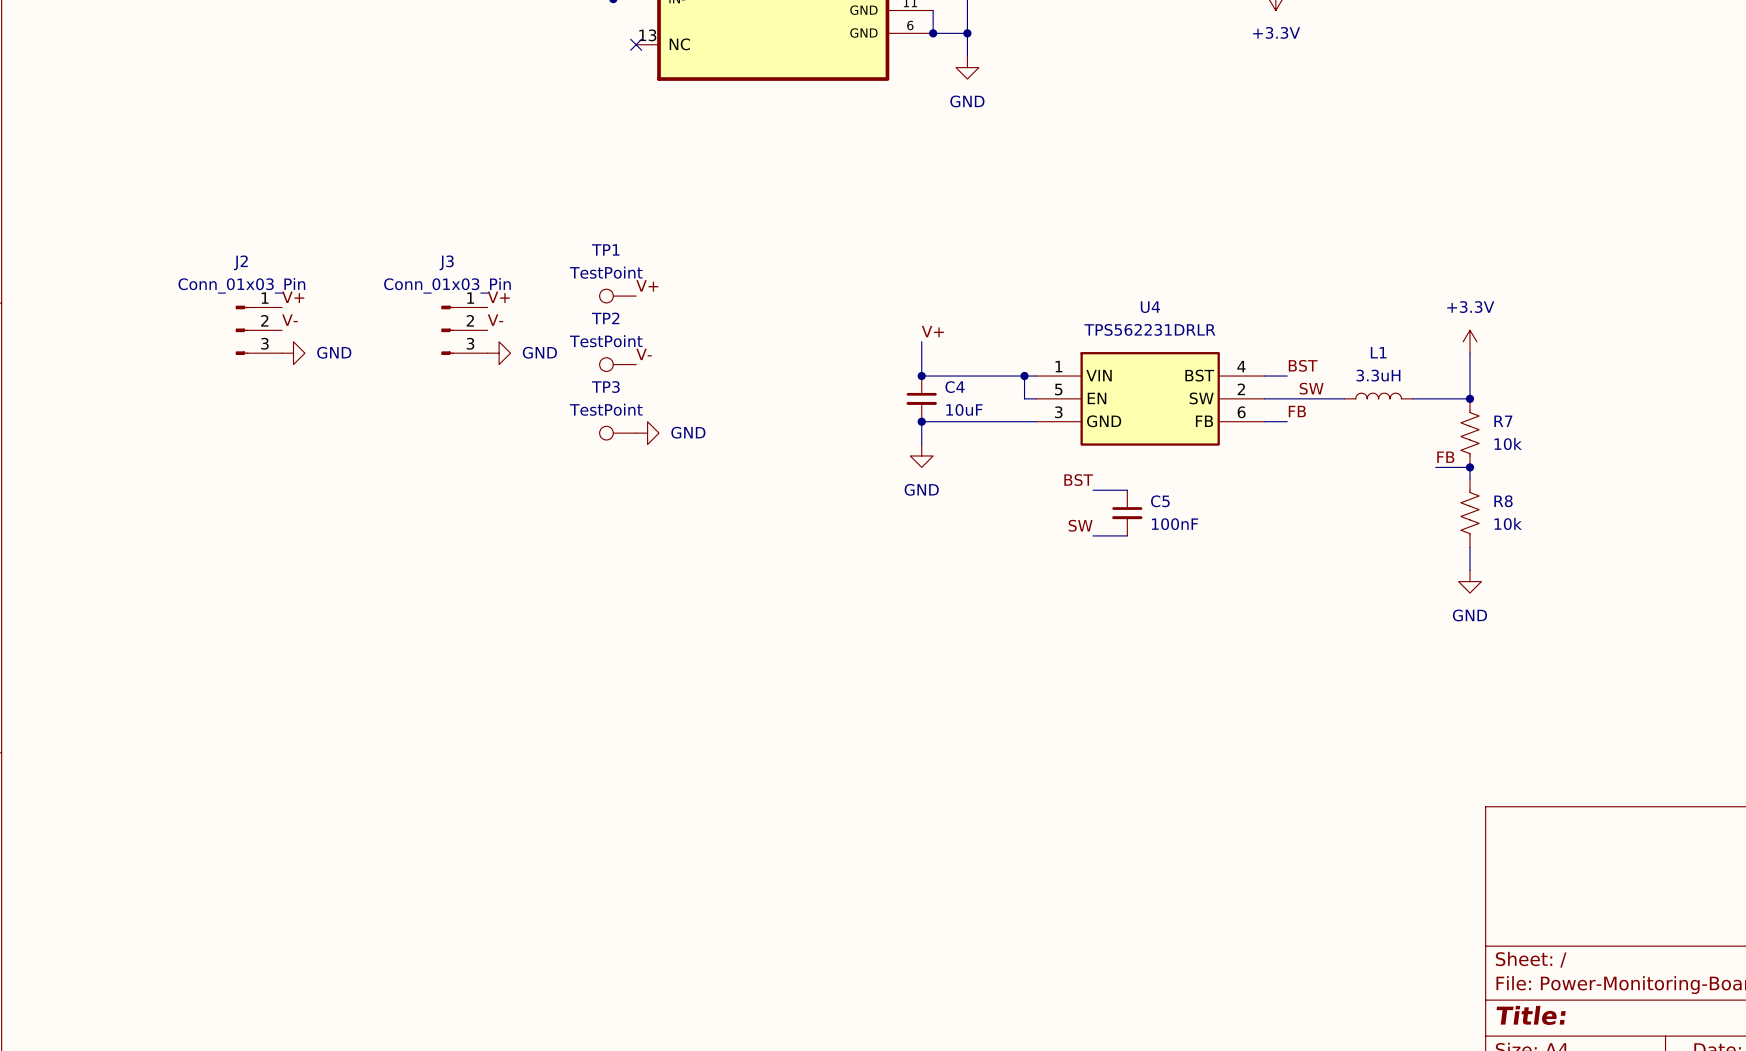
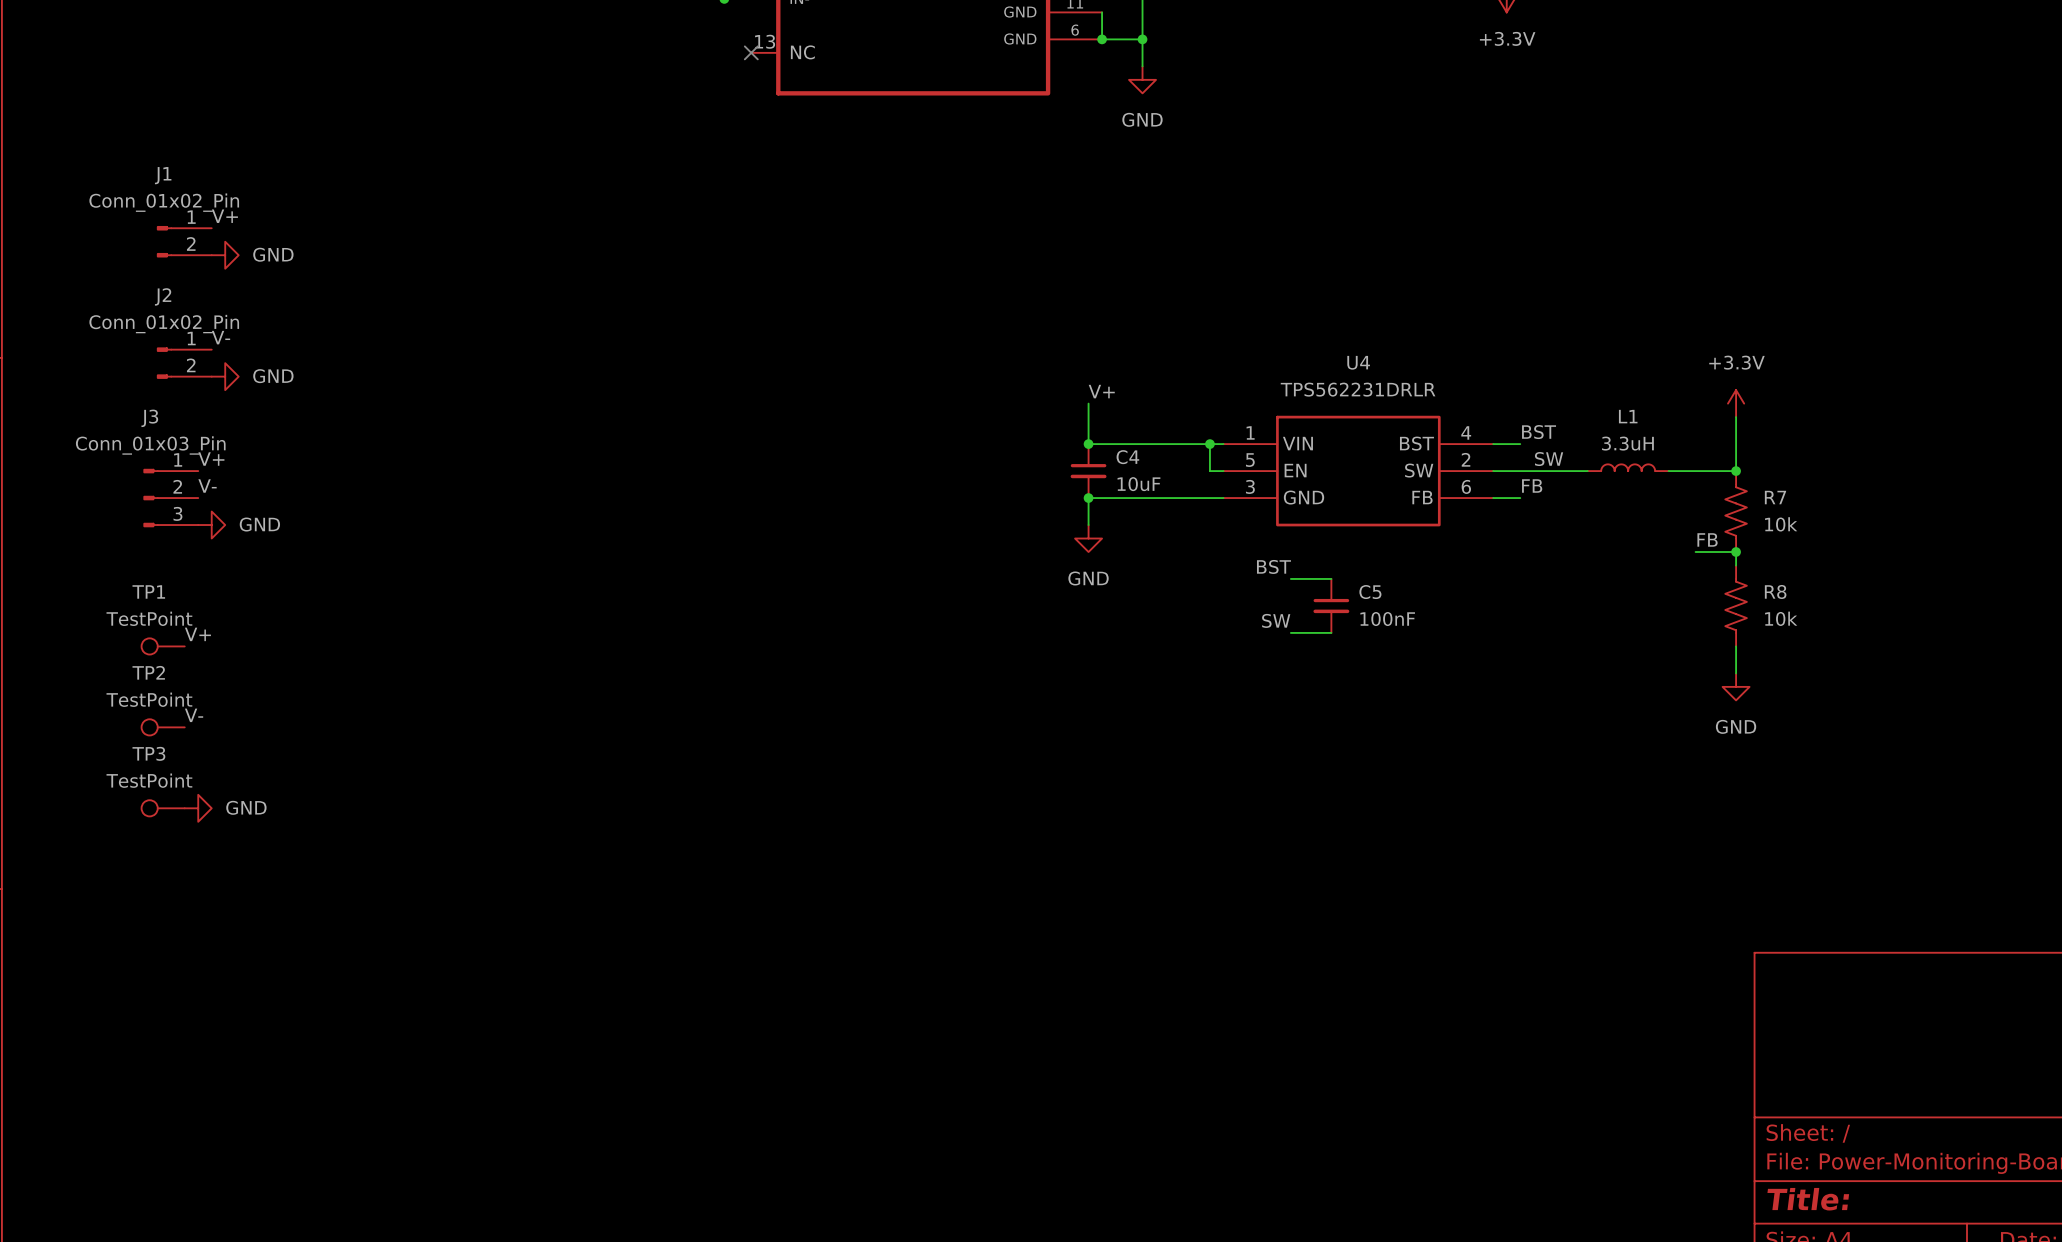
label: none -> V+ (224, 216)
J1: none -> Conn_01x02_Pin (184, 241)
power symbol: none -> GND (225, 255)
label: none -> V- (221, 337)
J2 value: Conn_01x03_Pin (241, 285) -> Conn_01x02_Pin (164, 324)
label: V+ (647, 285) -> none
TP1 position: (617, 296) -> (163, 646)
label: V+ (293, 297) -> none
label: V+ (498, 297) -> none
J2 symbol: [235, 305, 283, 356] -> [156, 347, 212, 379]
power symbol: none -> GND (225, 376)
label: V- (289, 320) -> none
label: V- (495, 320) -> none
J3 position: (464, 330) -> (170, 498)
power symbol: GND (293, 353) -> none
power symbol: GND (499, 353) -> none
label: V- (644, 354) -> none
TP2 position: (617, 364) -> (163, 727)
label: none -> V+ (211, 459)
label: none -> V- (207, 486)
TP3 position: (617, 433) -> (163, 808)
power symbol: GND (647, 433) -> none
power symbol: none -> GND (211, 525)
label: none -> V+ (197, 634)
label: none -> V- (194, 715)
power symbol: none -> GND (198, 808)

